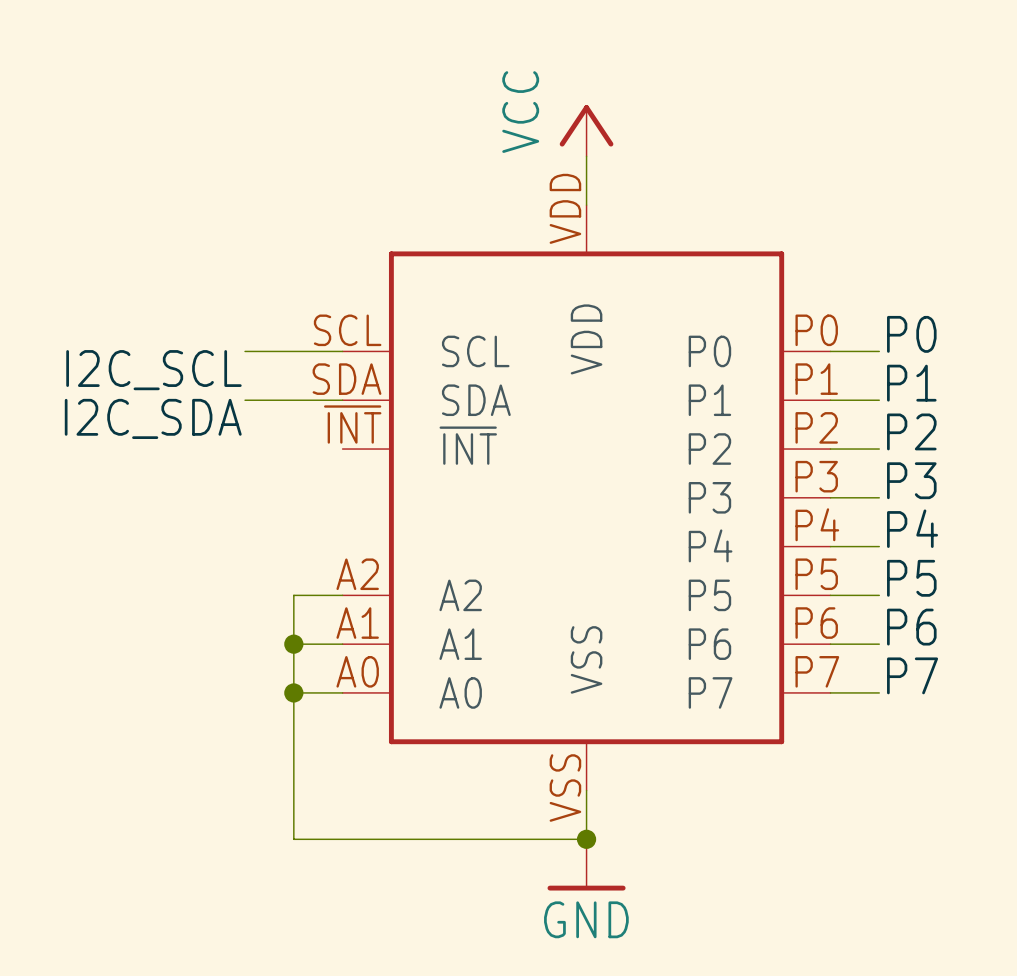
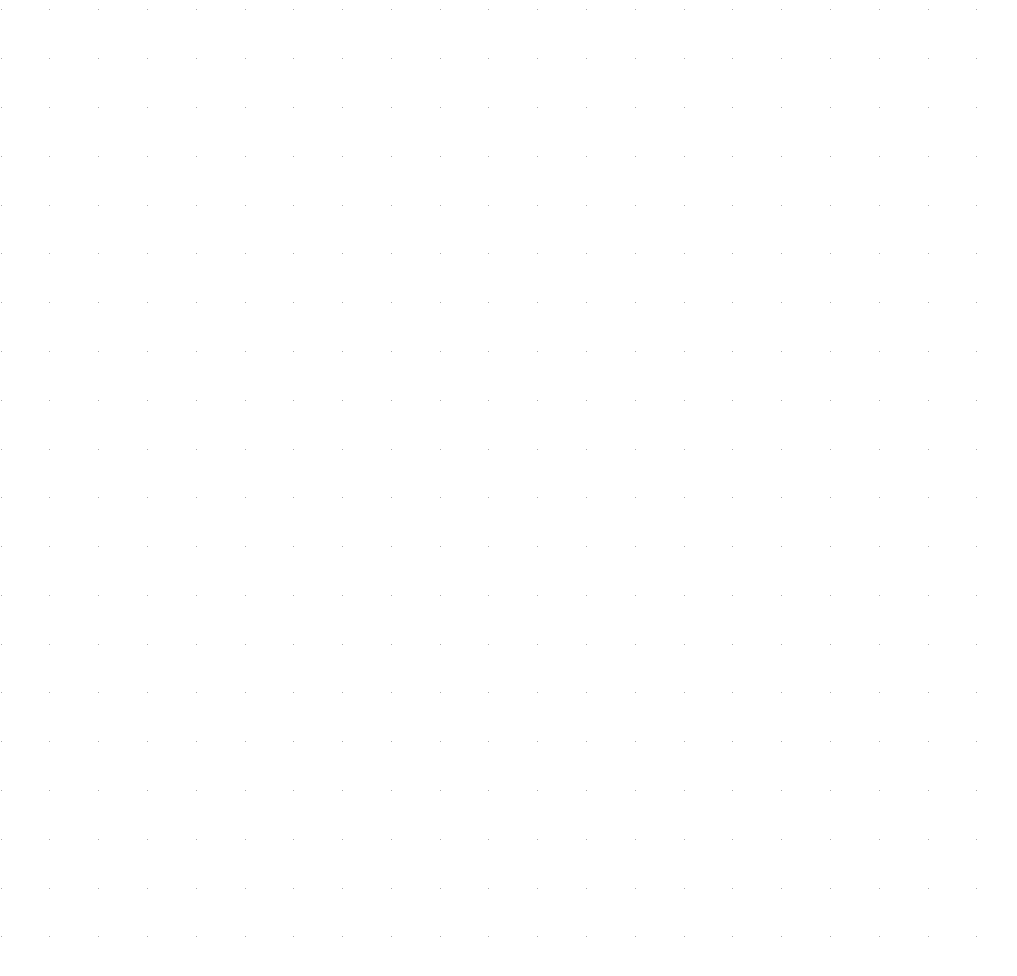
power symbol: VCC (586, 130) -> none
wire: (586, 156) (586, 205) -> none
label: P0 (911, 334) -> none
wire: (245, 351) (342, 351) -> none
wire: (830, 351) (879, 351) -> none
label: I2C_SCL (153, 370) -> none
label: P1 (911, 383) -> none
wire: (245, 400) (342, 400) -> none
wire: (830, 400) (879, 400) -> none
label: I2C_SDA (153, 418) -> none
label: P2 (911, 431) -> none
wire: (830, 449) (879, 449) -> none
label: P3 (911, 480) -> none
part: (586, 497) -> none
wire: (830, 497) (879, 497) -> none
label: P4 (912, 528) -> none
wire: (830, 546) (879, 546) -> none
label: P5 (911, 578) -> none
wire: (342, 595) (293, 595) (293, 839) (586, 839) (586, 790) -> none
wire: (830, 595) (879, 595) -> none
label: P6 (911, 627) -> none
wire: (293, 644) (342, 644) -> none
junction: (293, 644) -> none
wire: (830, 644) (879, 644) -> none
label: P7 (912, 675) -> none
wire: (293, 692) (342, 692) -> none
junction: (293, 692) -> none
wire: (830, 692) (879, 692) -> none
junction: (586, 839) -> none
power symbol: GND (586, 864) -> none

